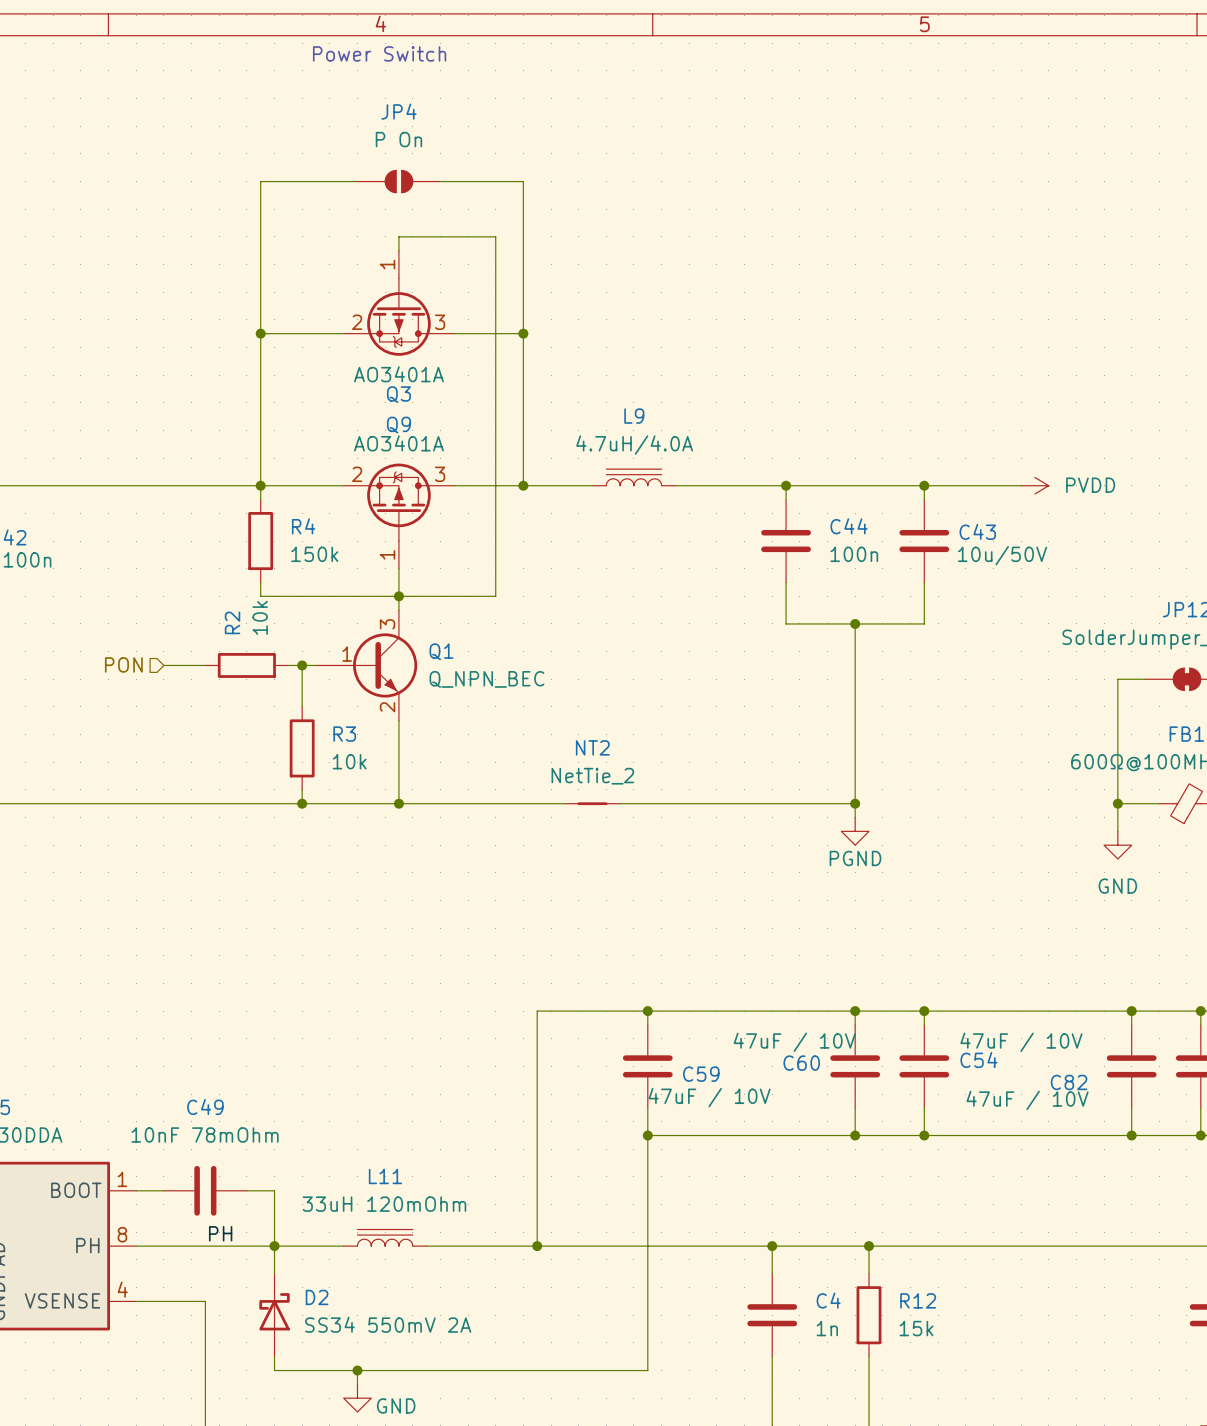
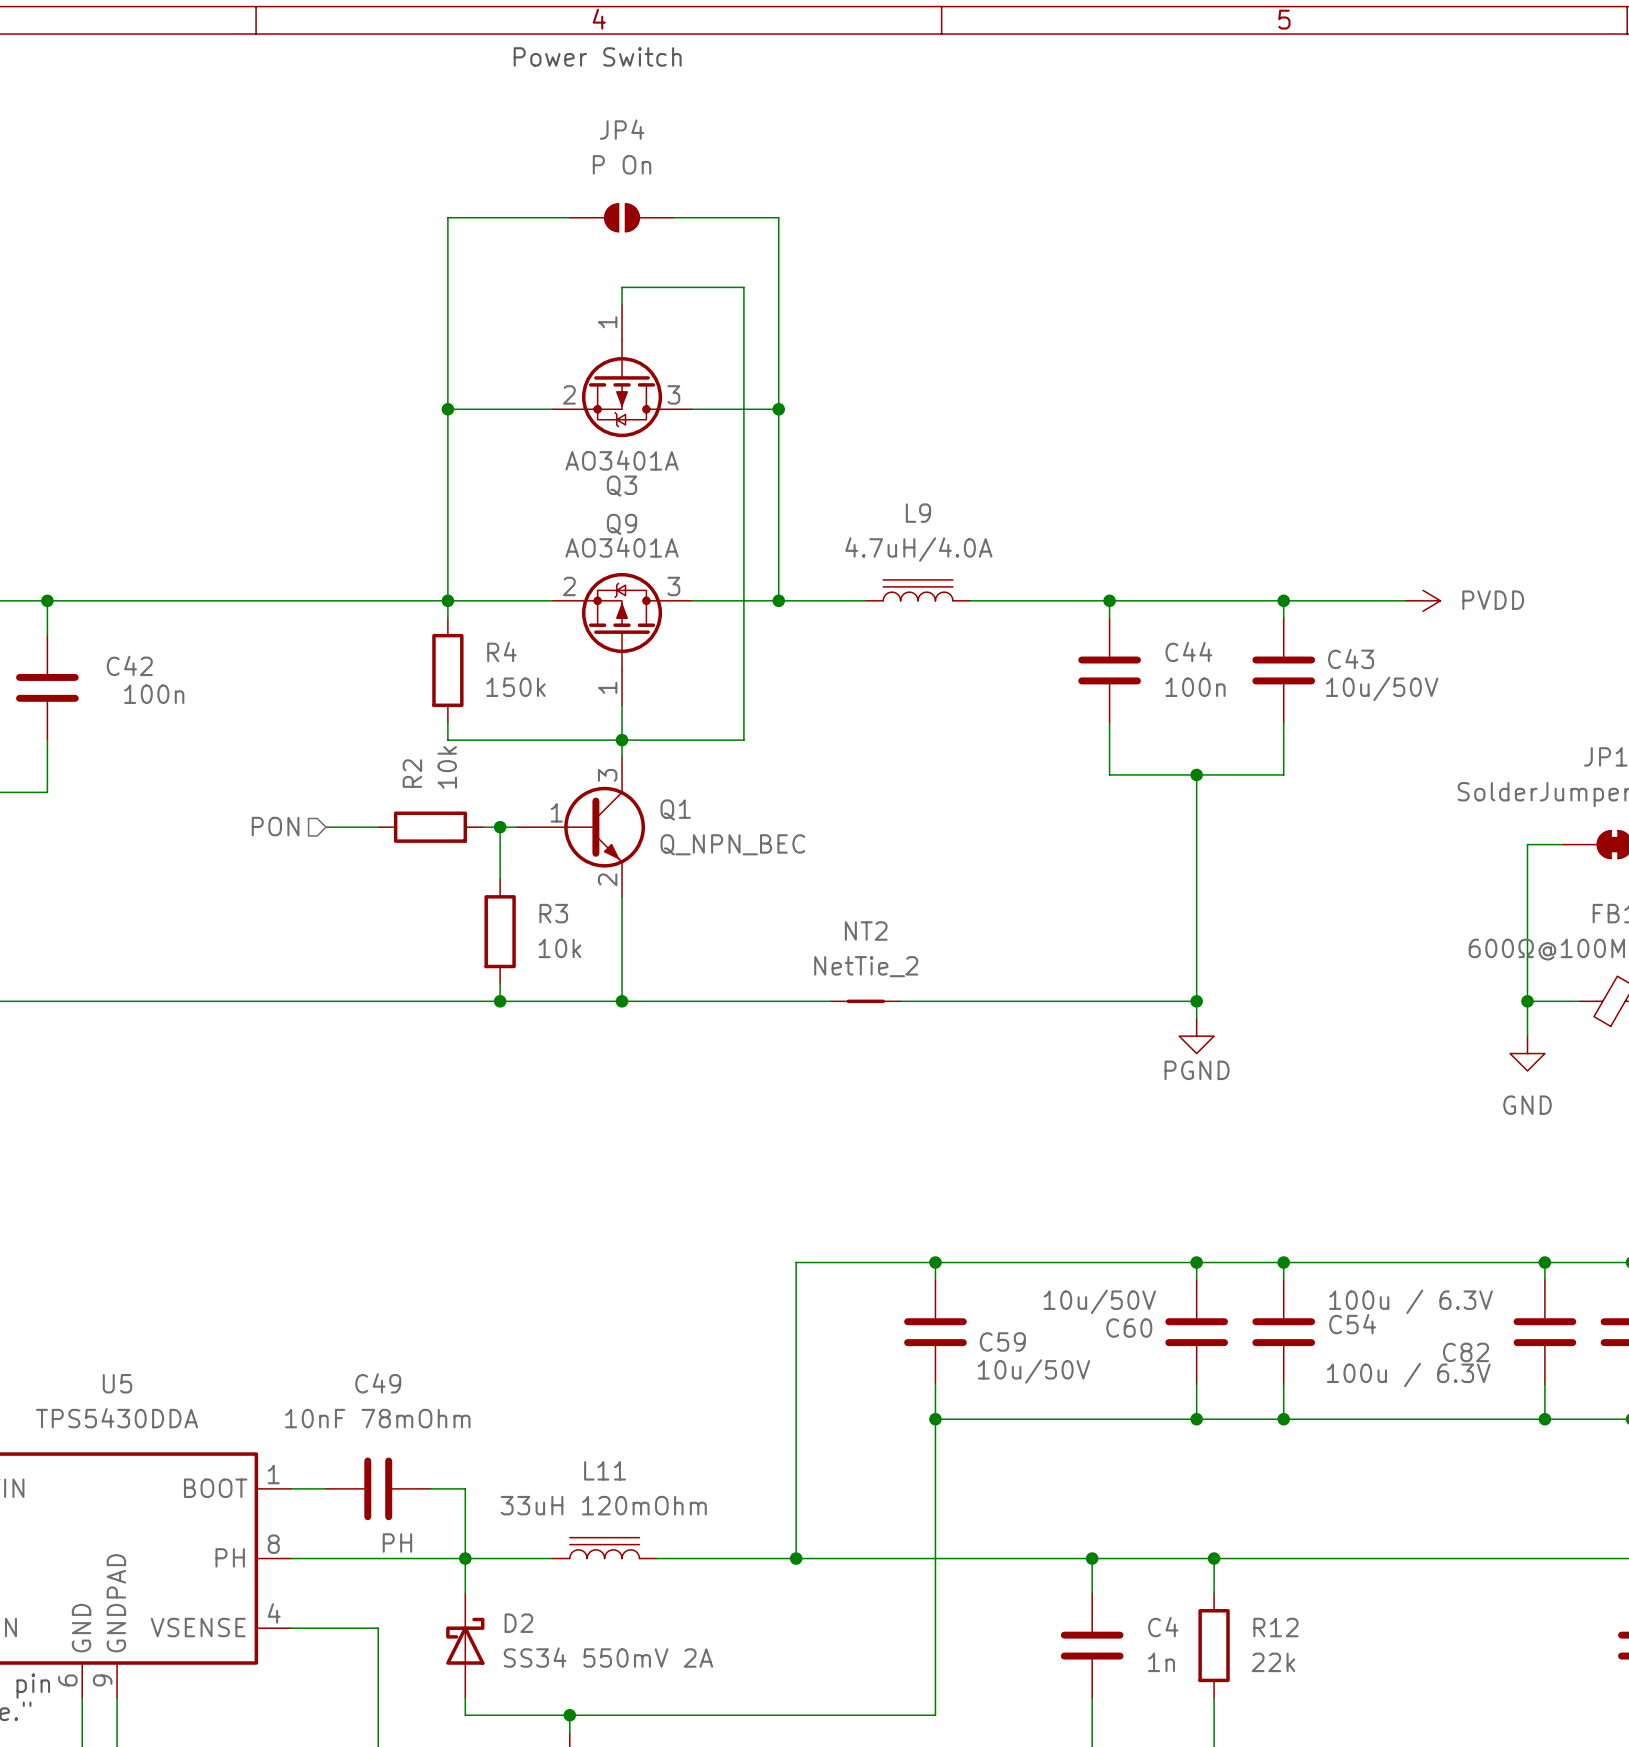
C60 value: 47uF / 10V (794, 1042) -> 10u/50V (1099, 1301)
C54 value: 47uF / 10V (1021, 1042) -> 100u / 6.3V (1411, 1301)
C59 value: 47uF / 10V (709, 1097) -> 10u/50V (1034, 1371)
C82 value: 47uF / 10V (1027, 1100) -> 100u / 6.3V (1408, 1374)
R12 value: 15k (916, 1328) -> 22k (1273, 1662)

